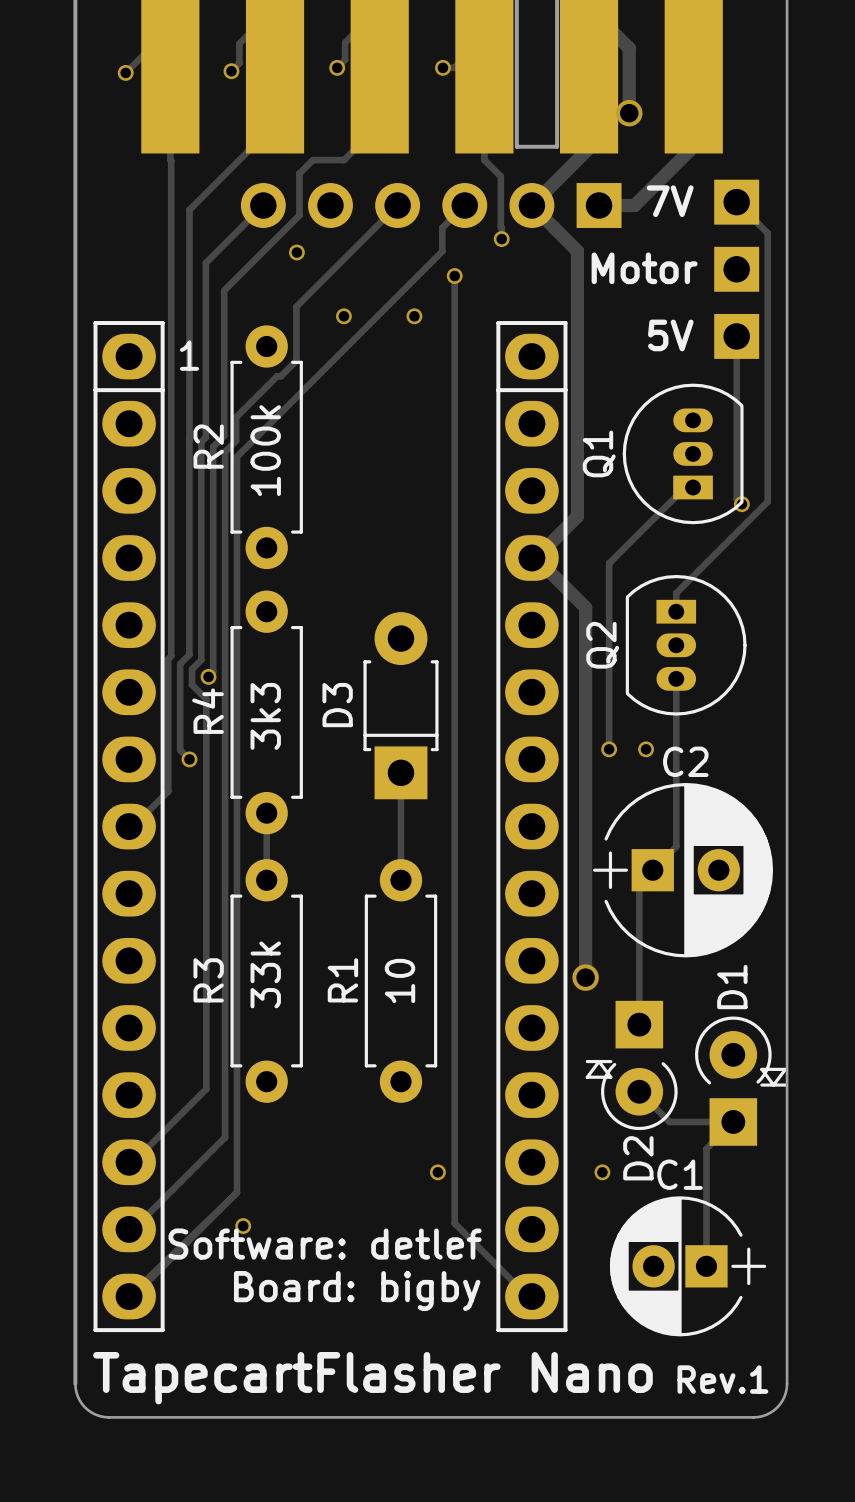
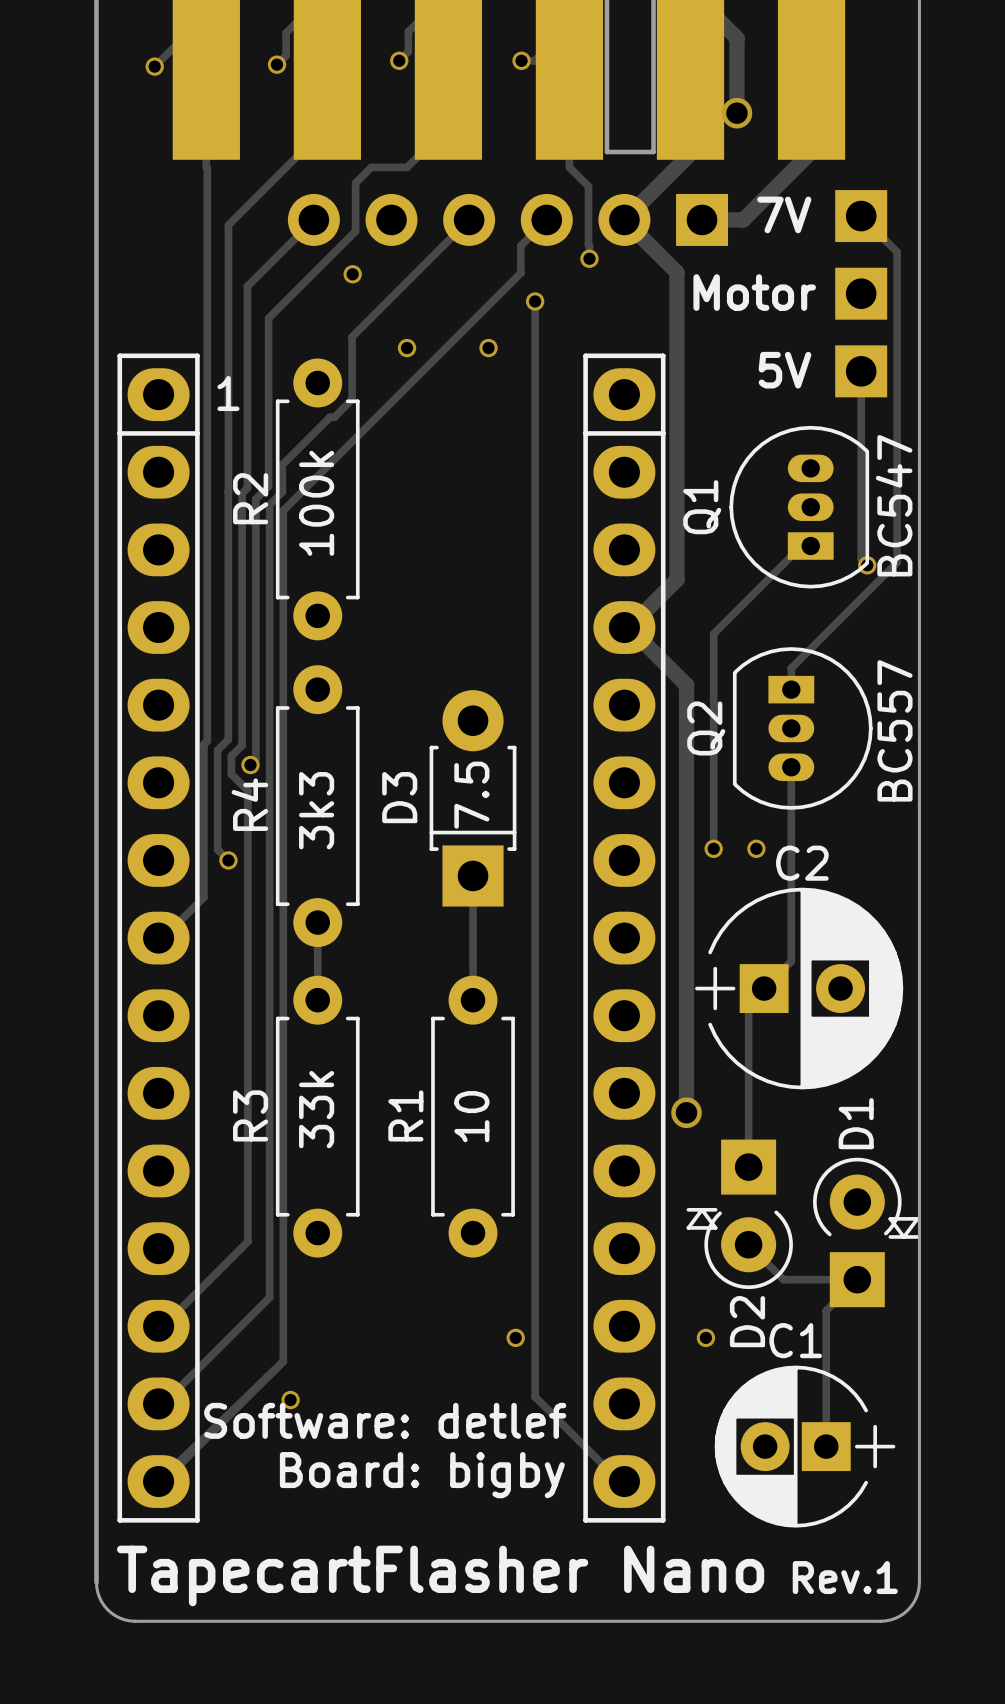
Q1 value: none -> BC547 (894, 505)
Q2 value: none -> BC557 (894, 730)
D3 value: none -> 7.5 (471, 795)

